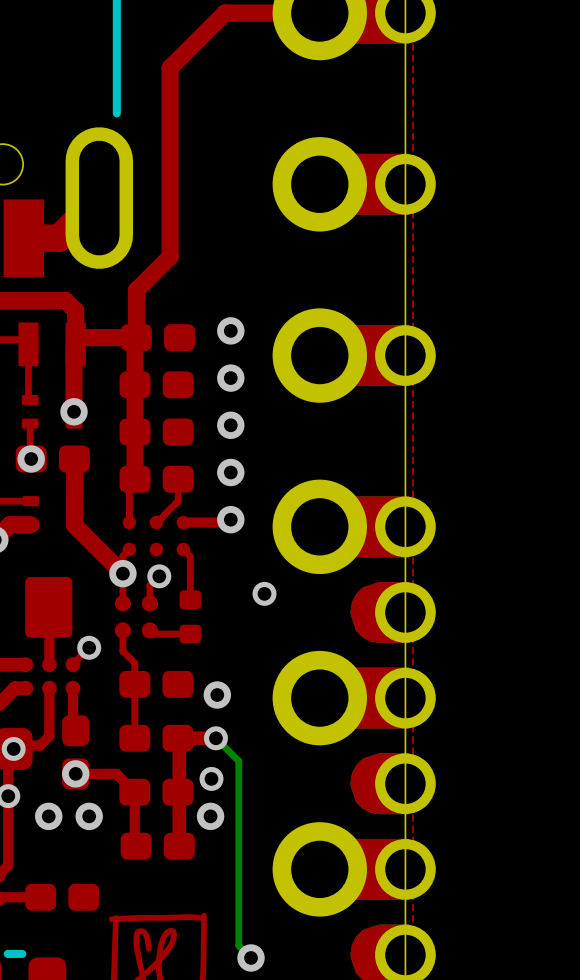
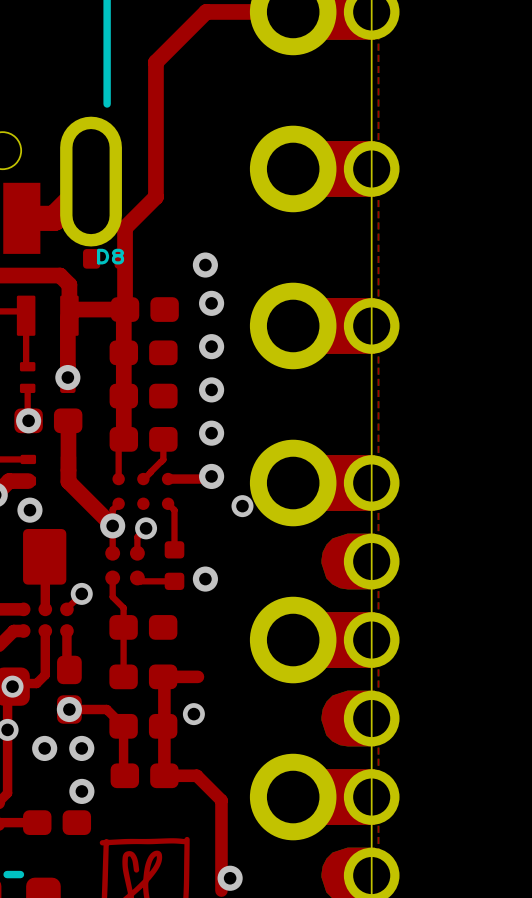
top track: (170, 214) (170, 256) (136, 290) -> (155, 197) (125, 227) (125, 266)
D8: none -> (107, 258)
via: none -> (205, 265)
via: none -> (29, 510)
via position: (264, 593) -> (242, 506)
via position: (217, 695) -> (205, 579)
bottom track: (215, 738) (238, 761) (238, 945) (251, 957) -> none
via: (215, 738) -> none
via: (210, 816) -> none
top track: none -> (164, 775) (196, 775) (221, 800) (221, 890)
via: none -> (81, 791)

